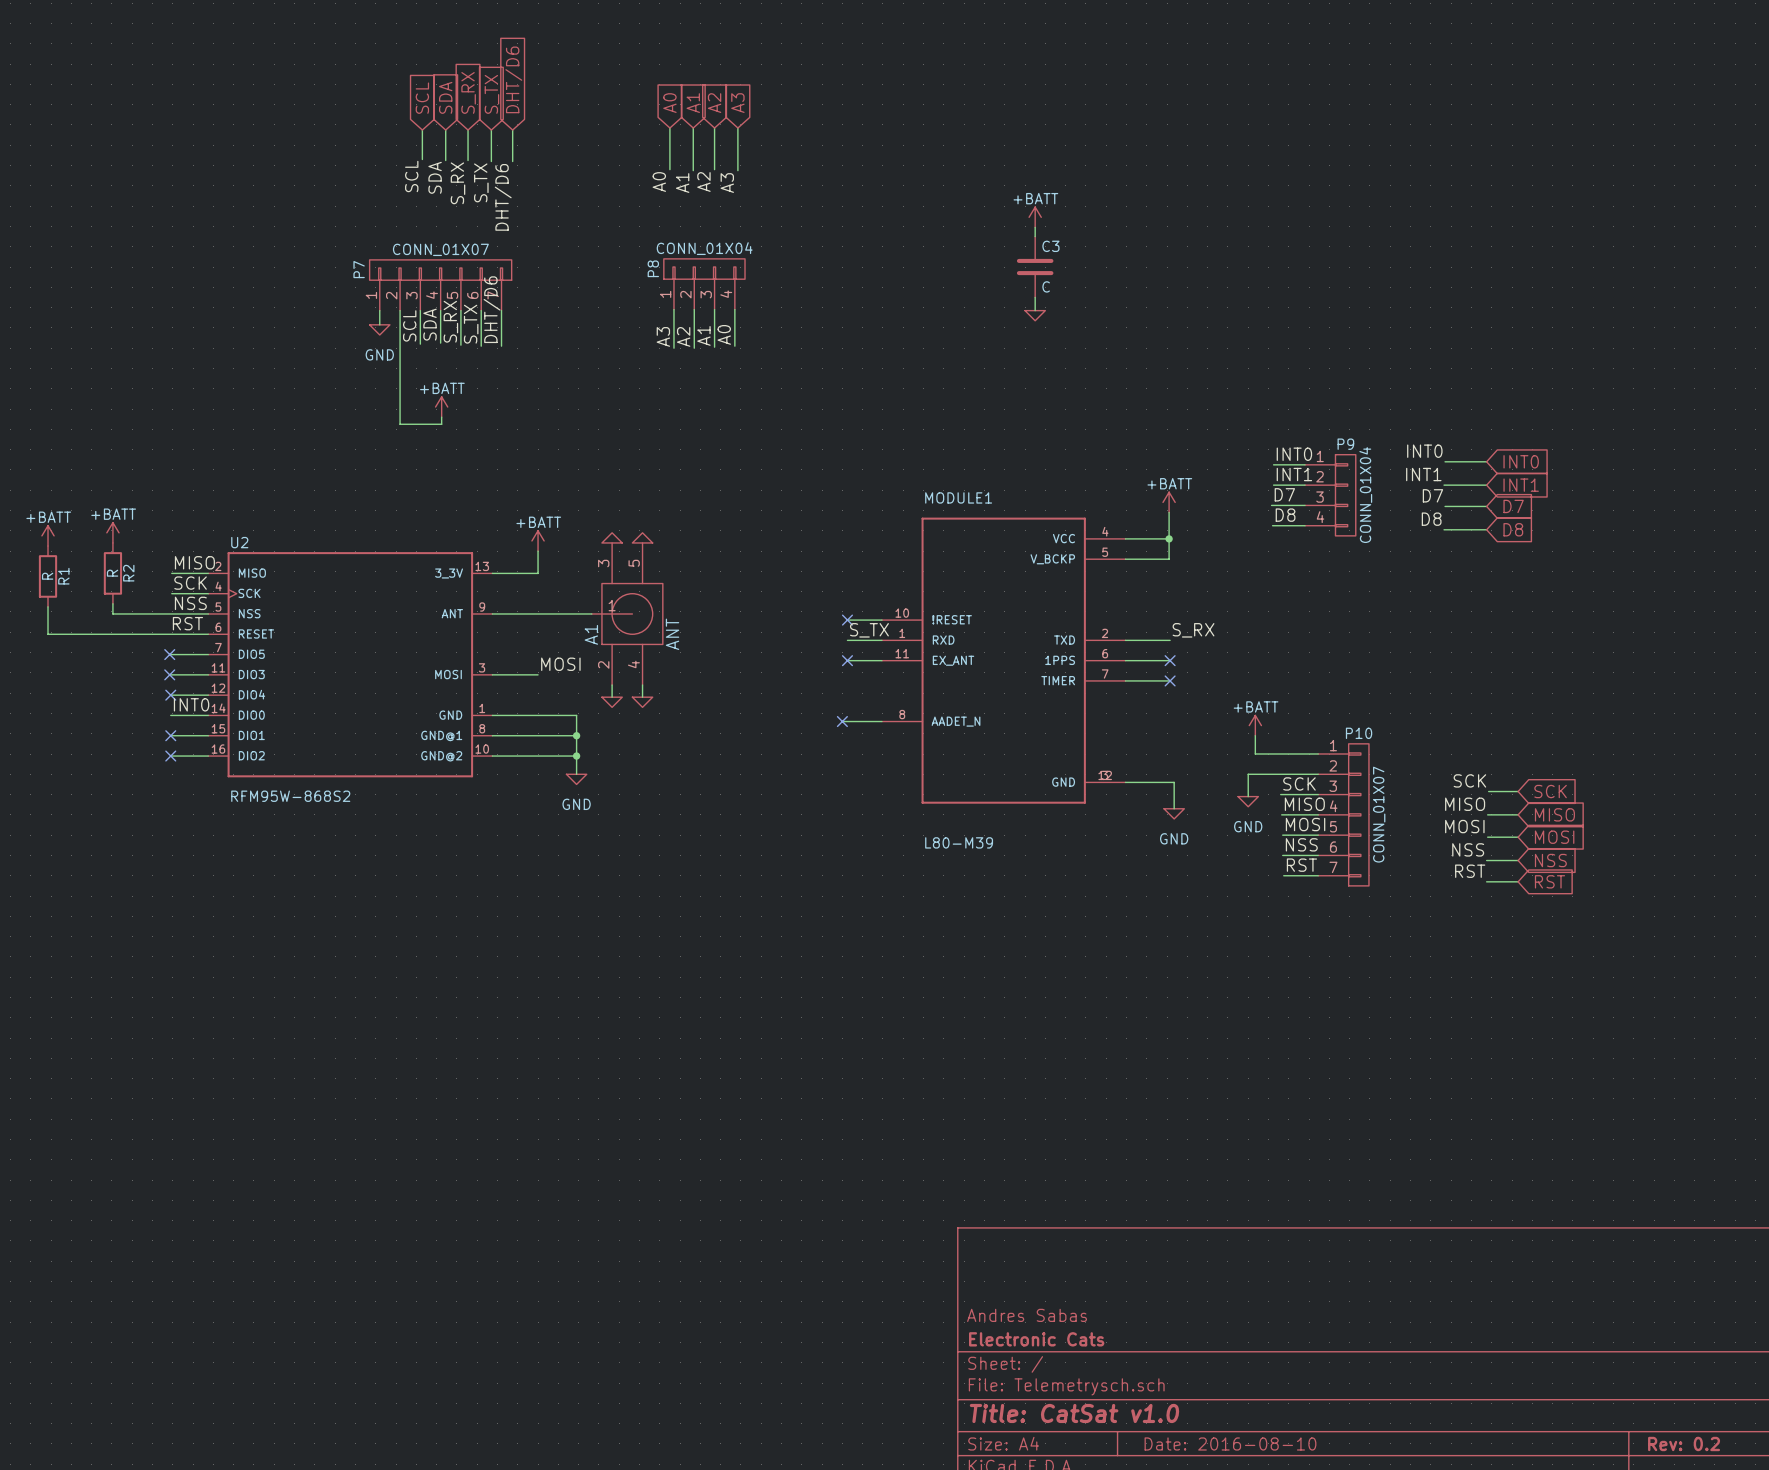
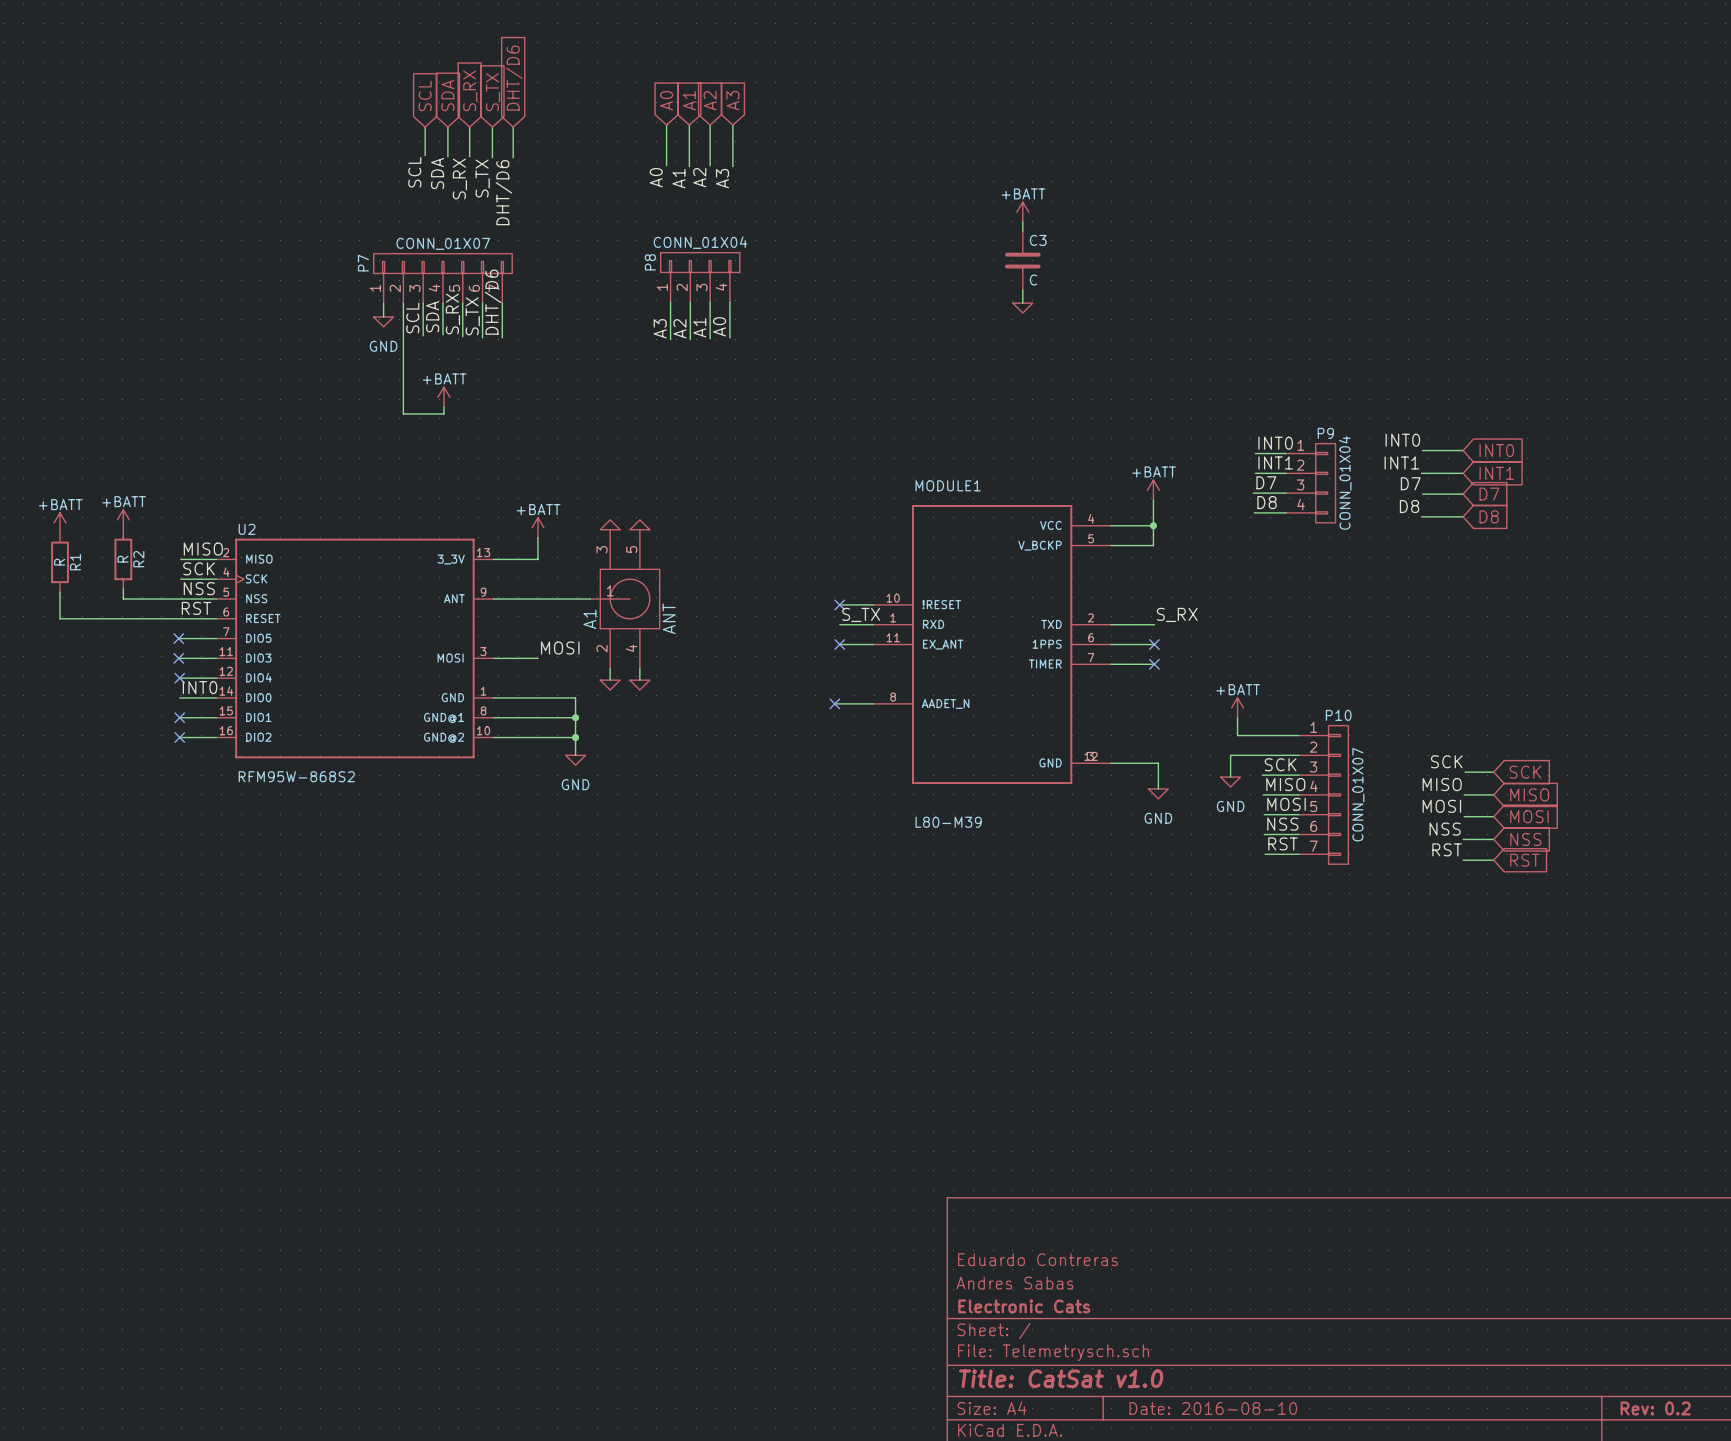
title block: none -> Eduardo Contreras (1037, 1259)

